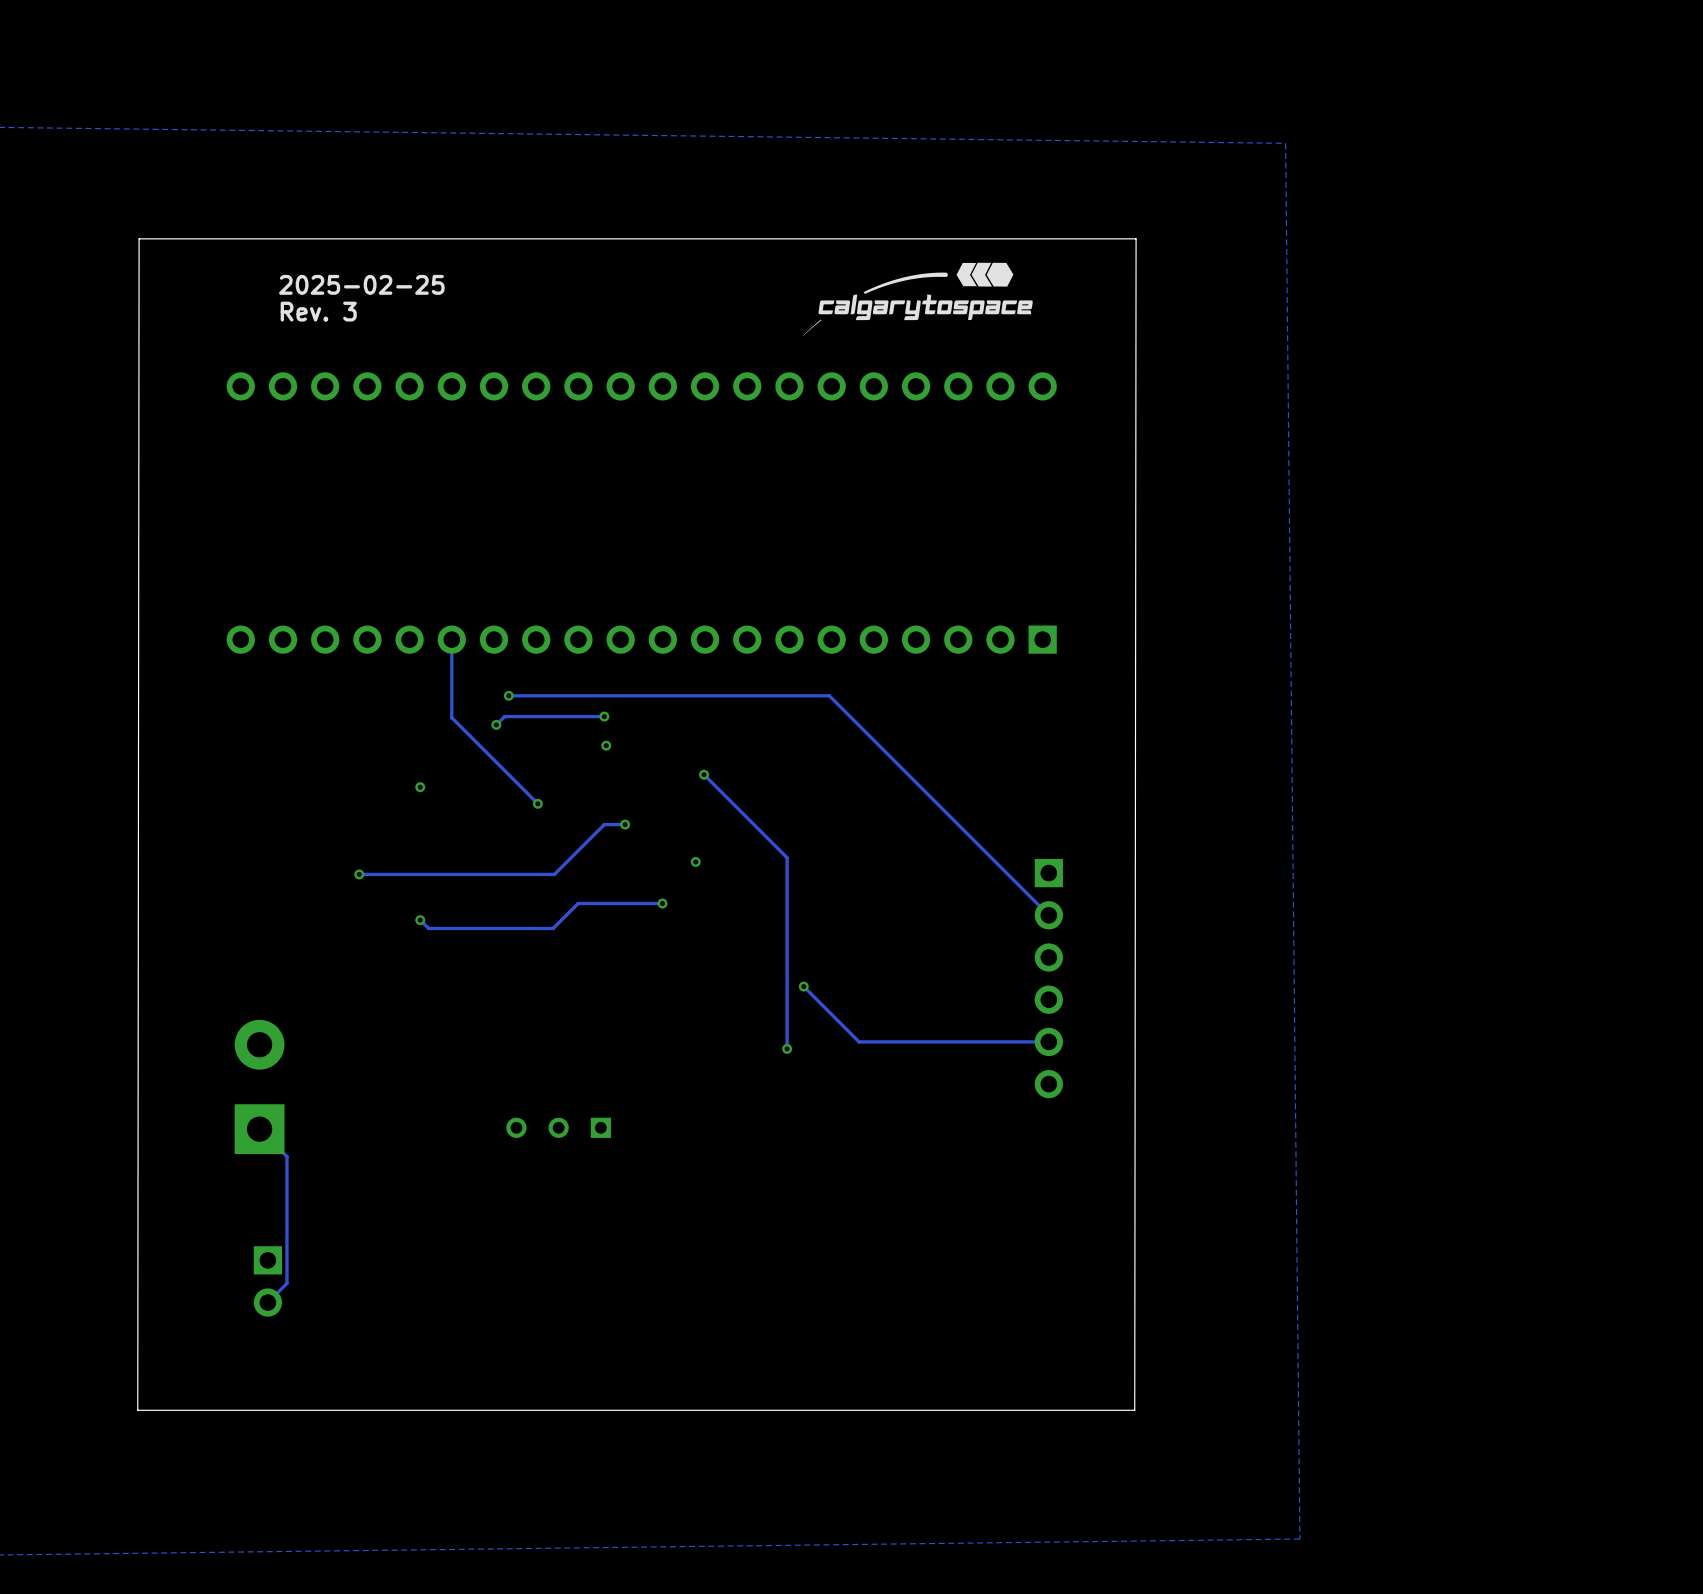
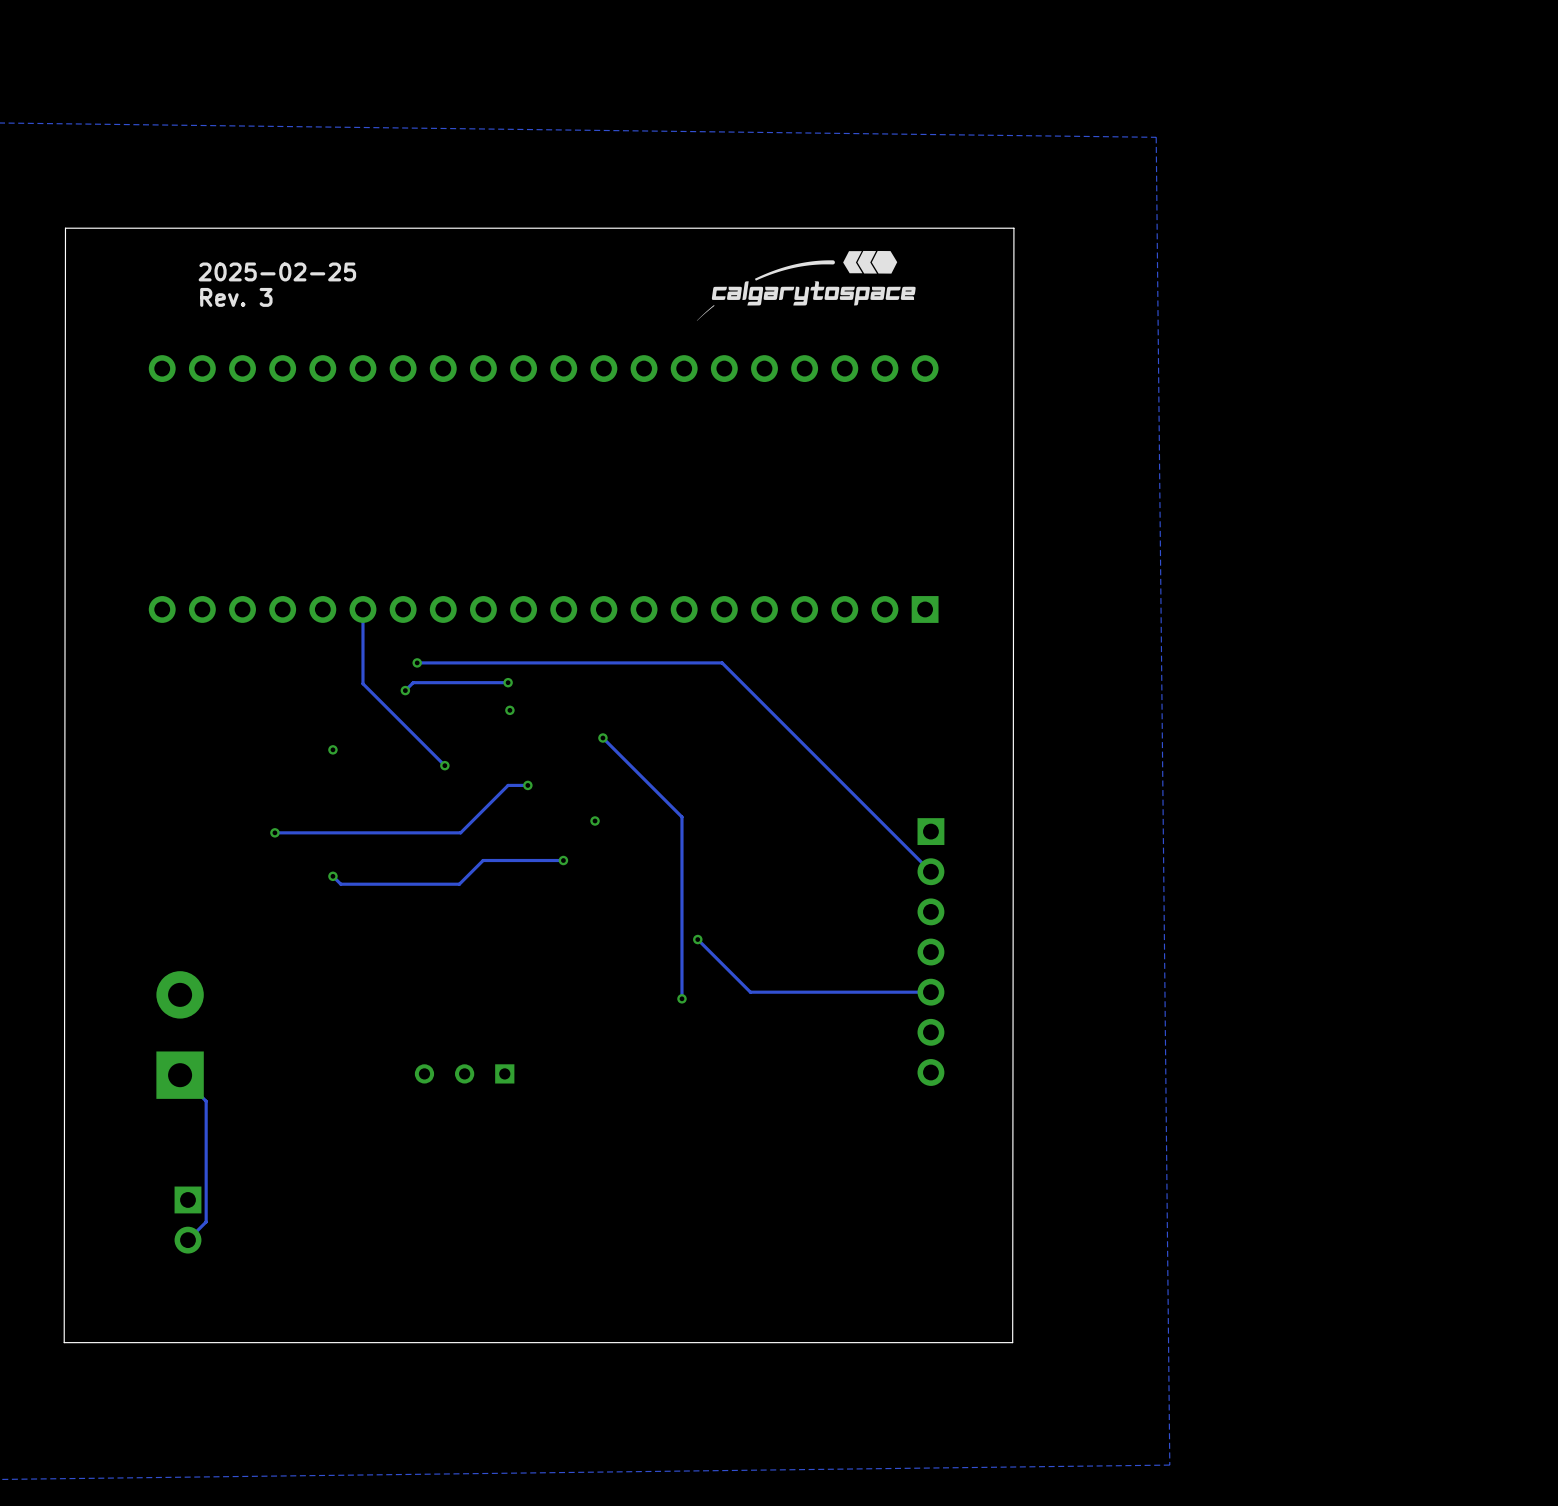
part: none -> (930, 952)

